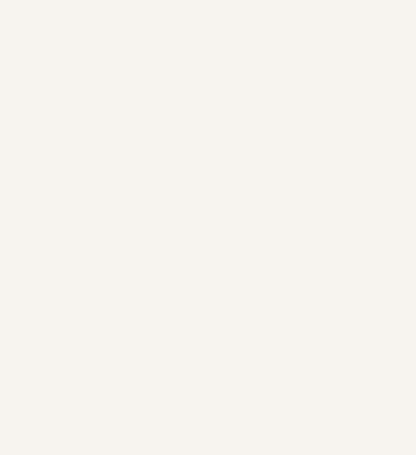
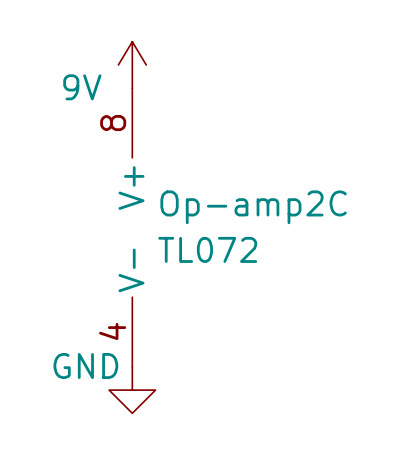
power symbol: none -> 9V (132, 64)
Op-amp2C: none -> TL072 (132, 227)
power symbol: none -> GND (132, 390)

